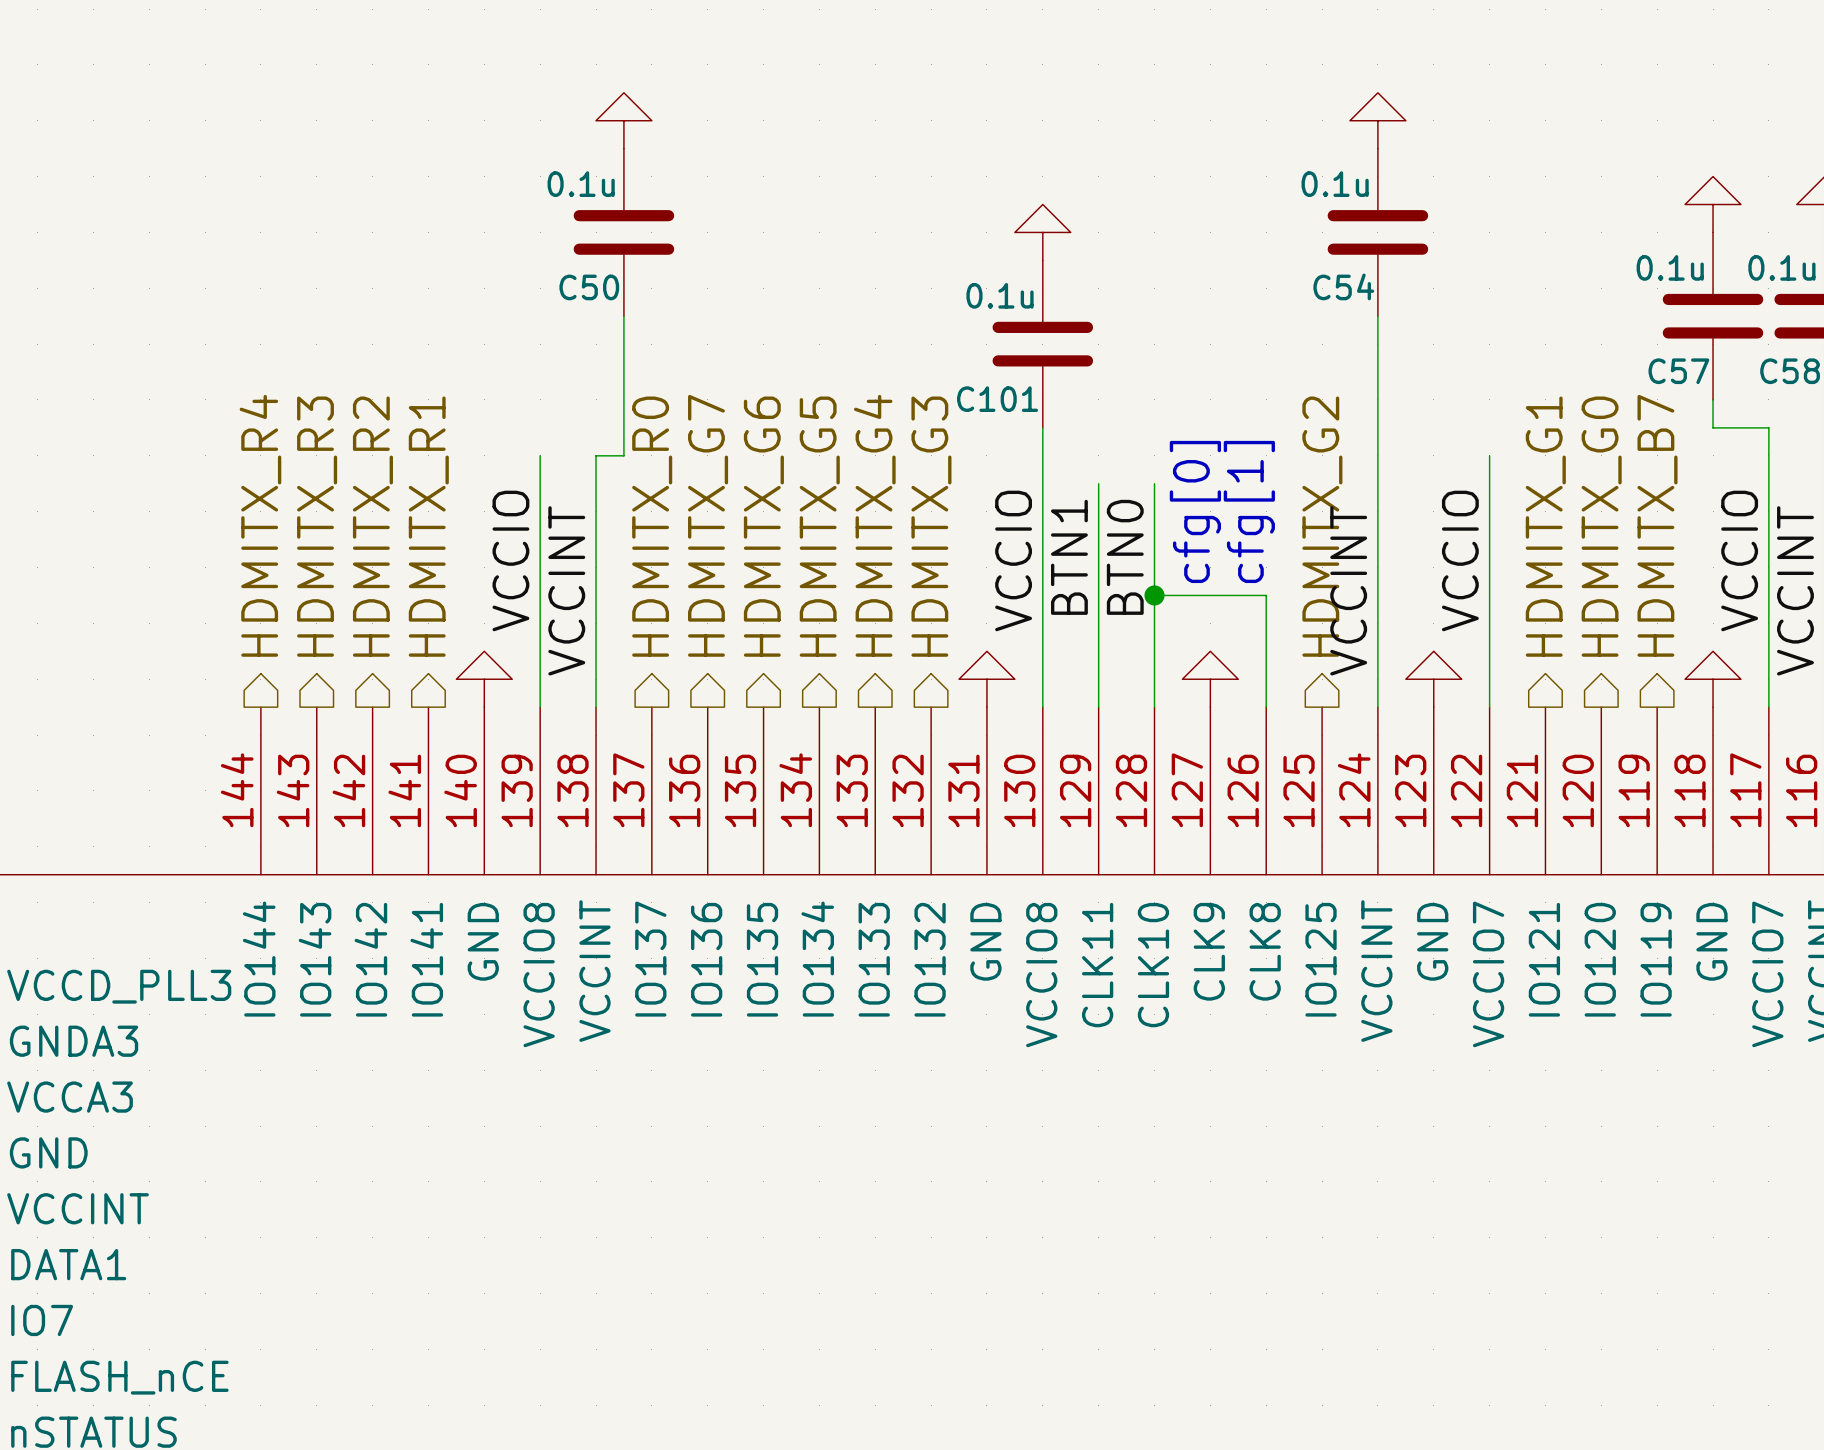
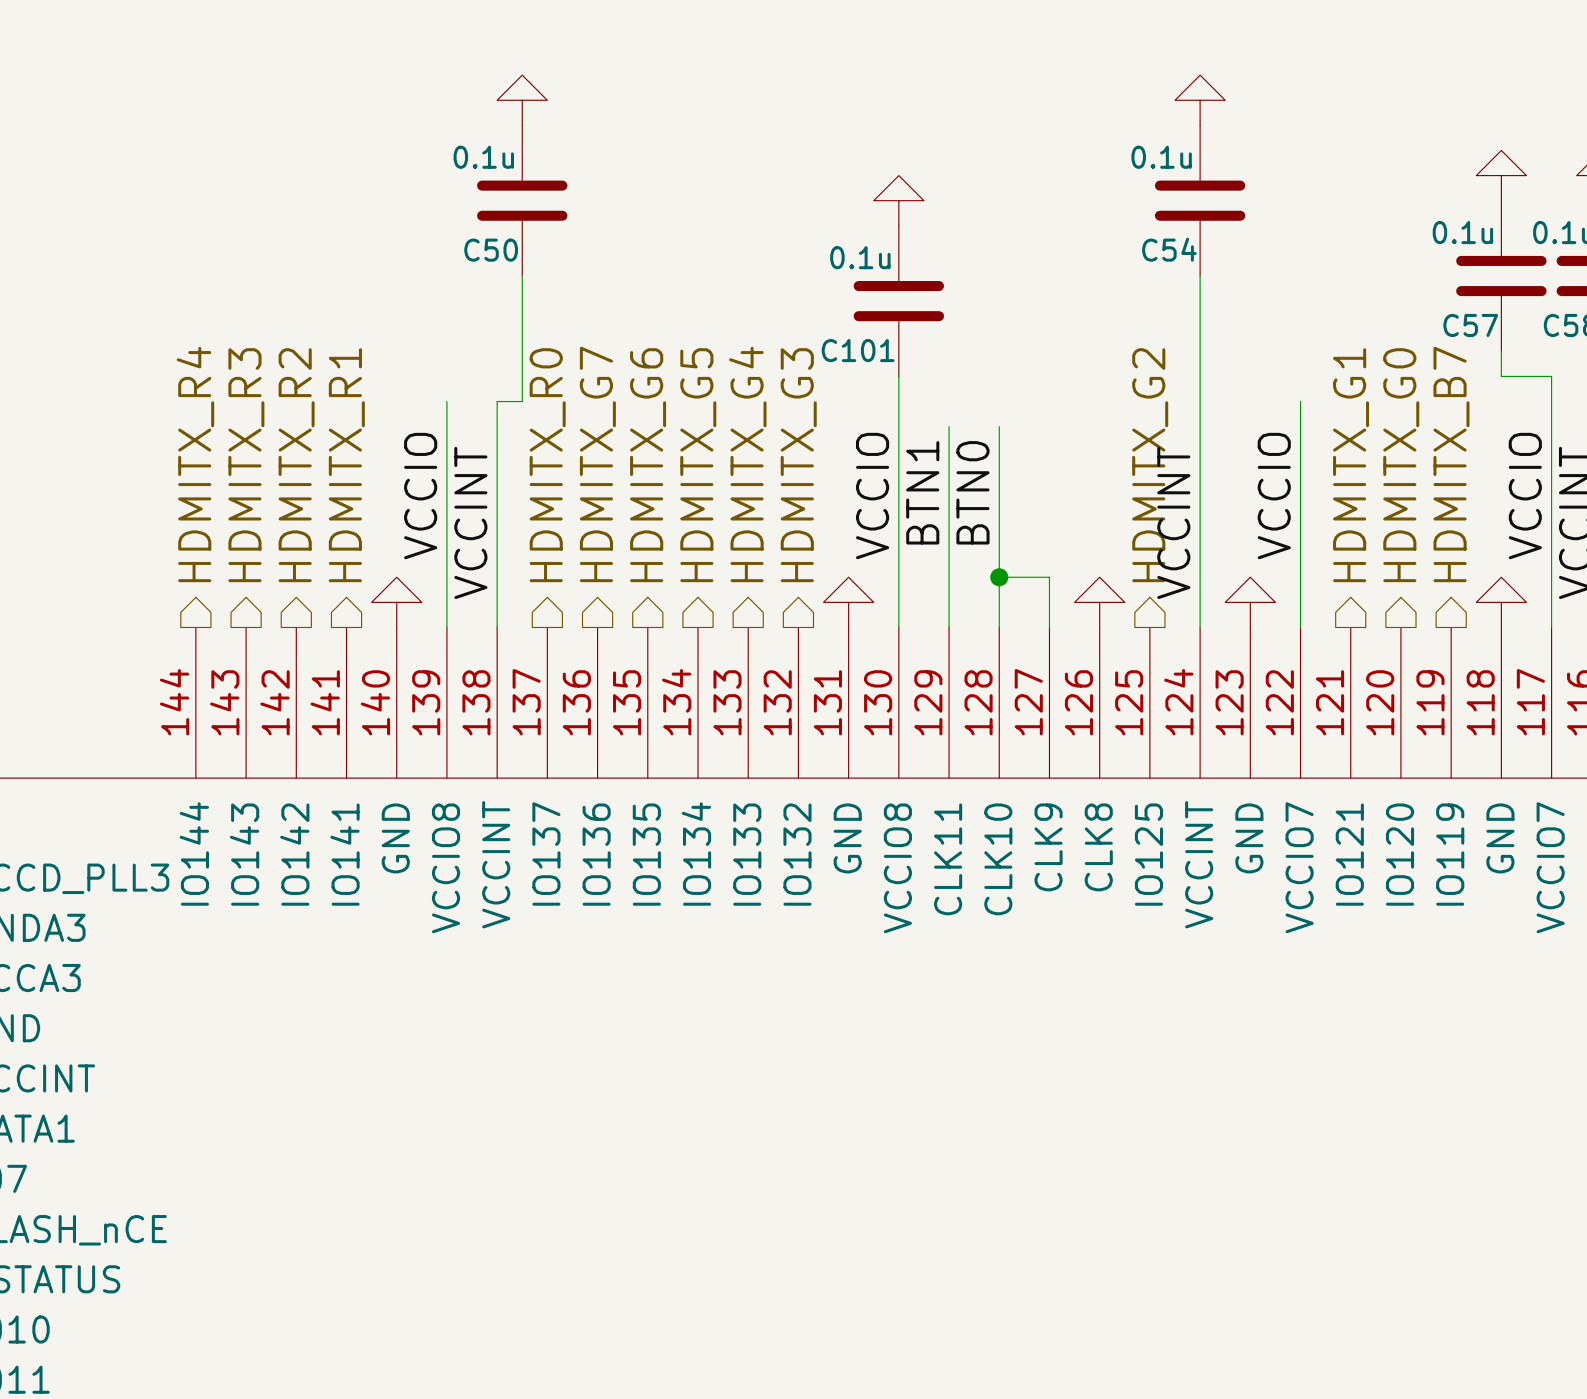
text: cfg[0] (1195, 511) -> none
text: cfg[1] (1249, 511) -> none
wire: (1154, 595) (1266, 595) (1266, 707) -> none
junction position: (1154, 595) -> (999, 577)
wire: none -> (999, 577) (1049, 577) (1049, 627)
power symbol position: (1210, 679) -> (1099, 602)

